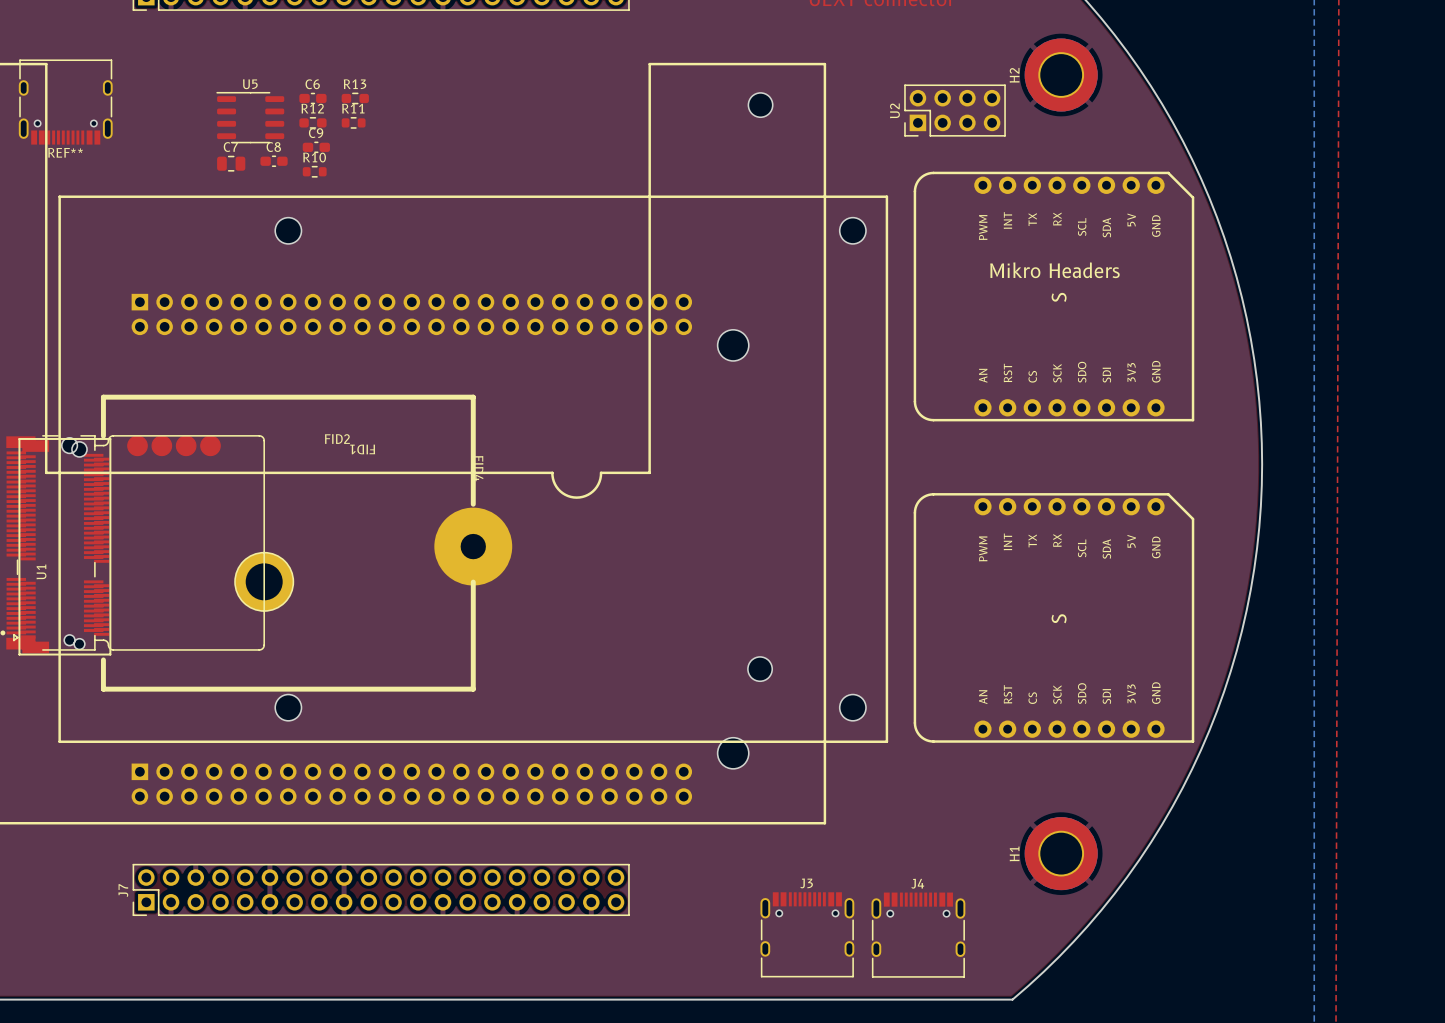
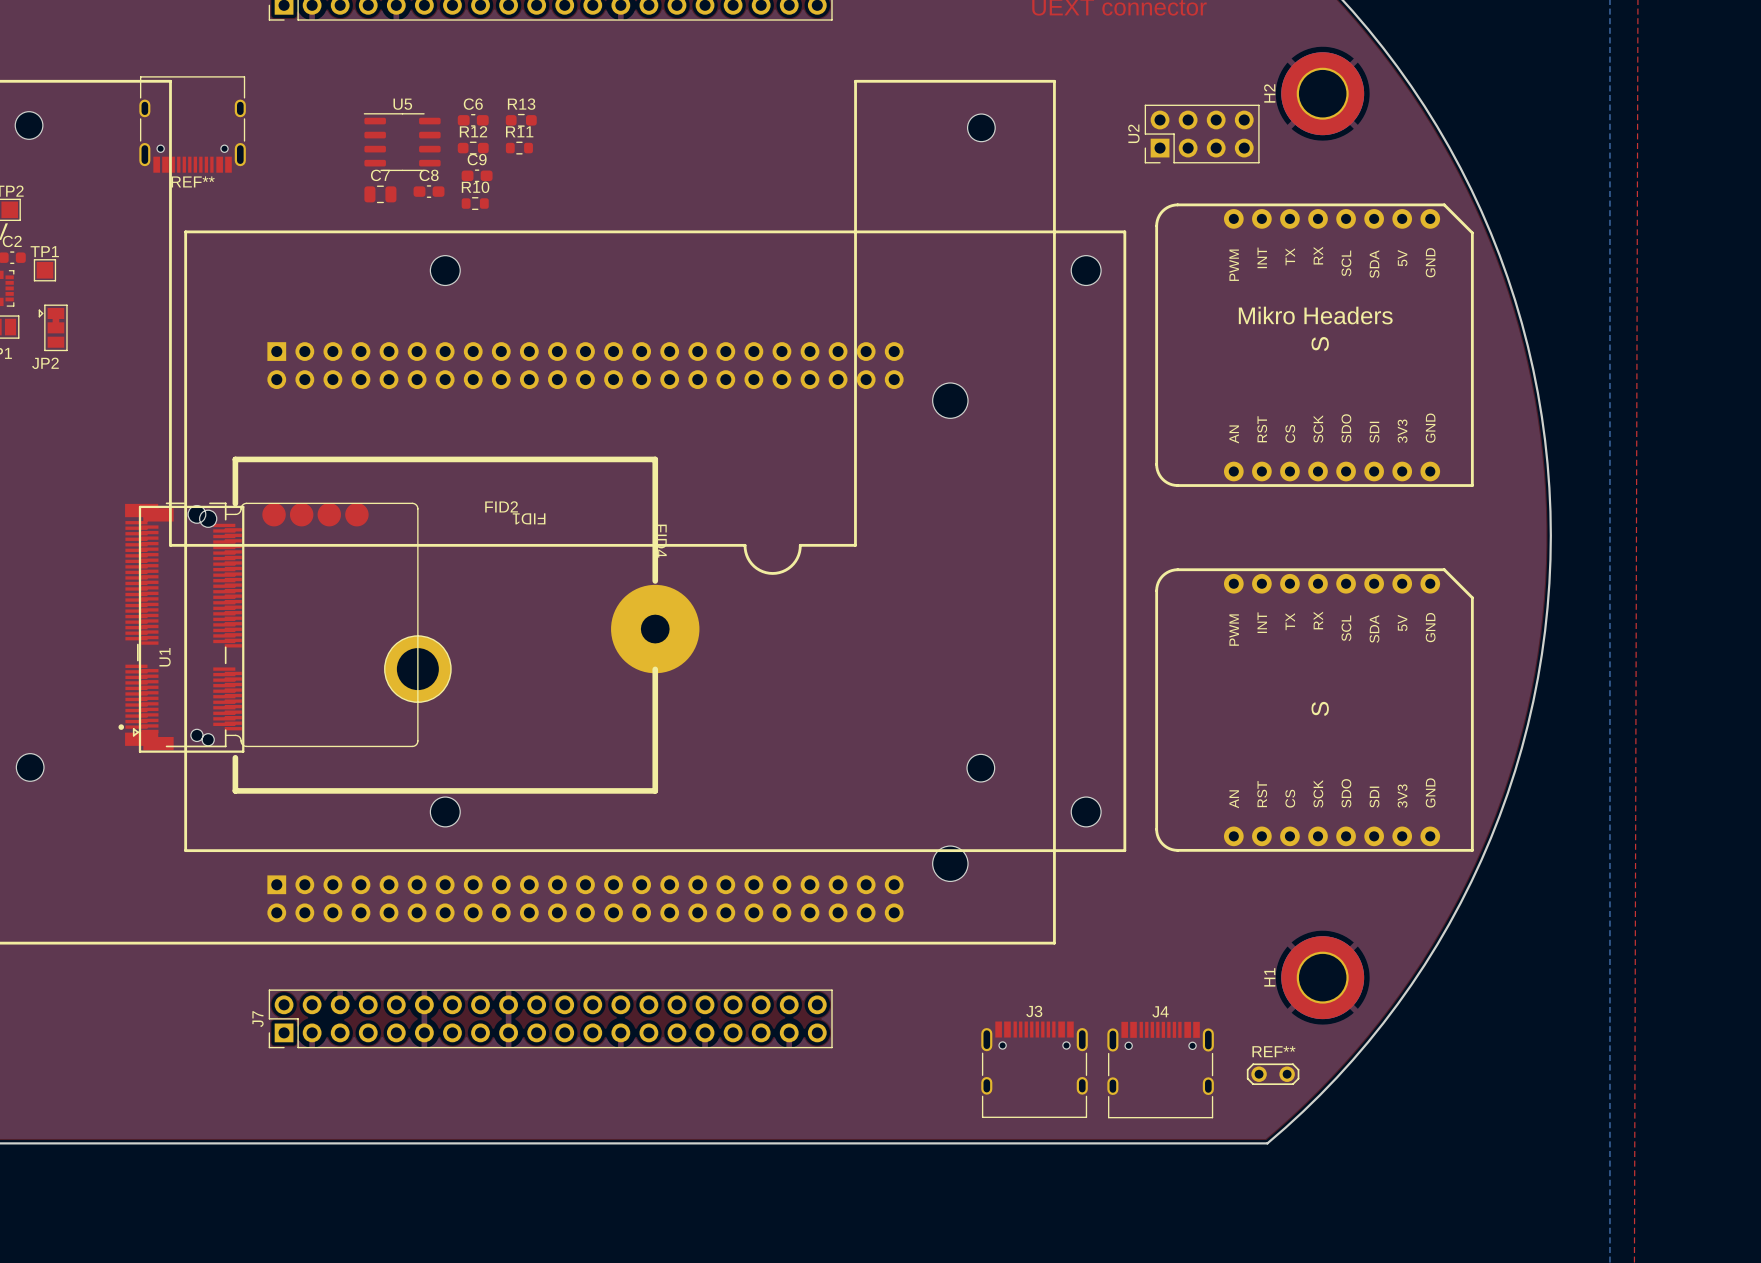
REF**: none -> (1273, 1074)

